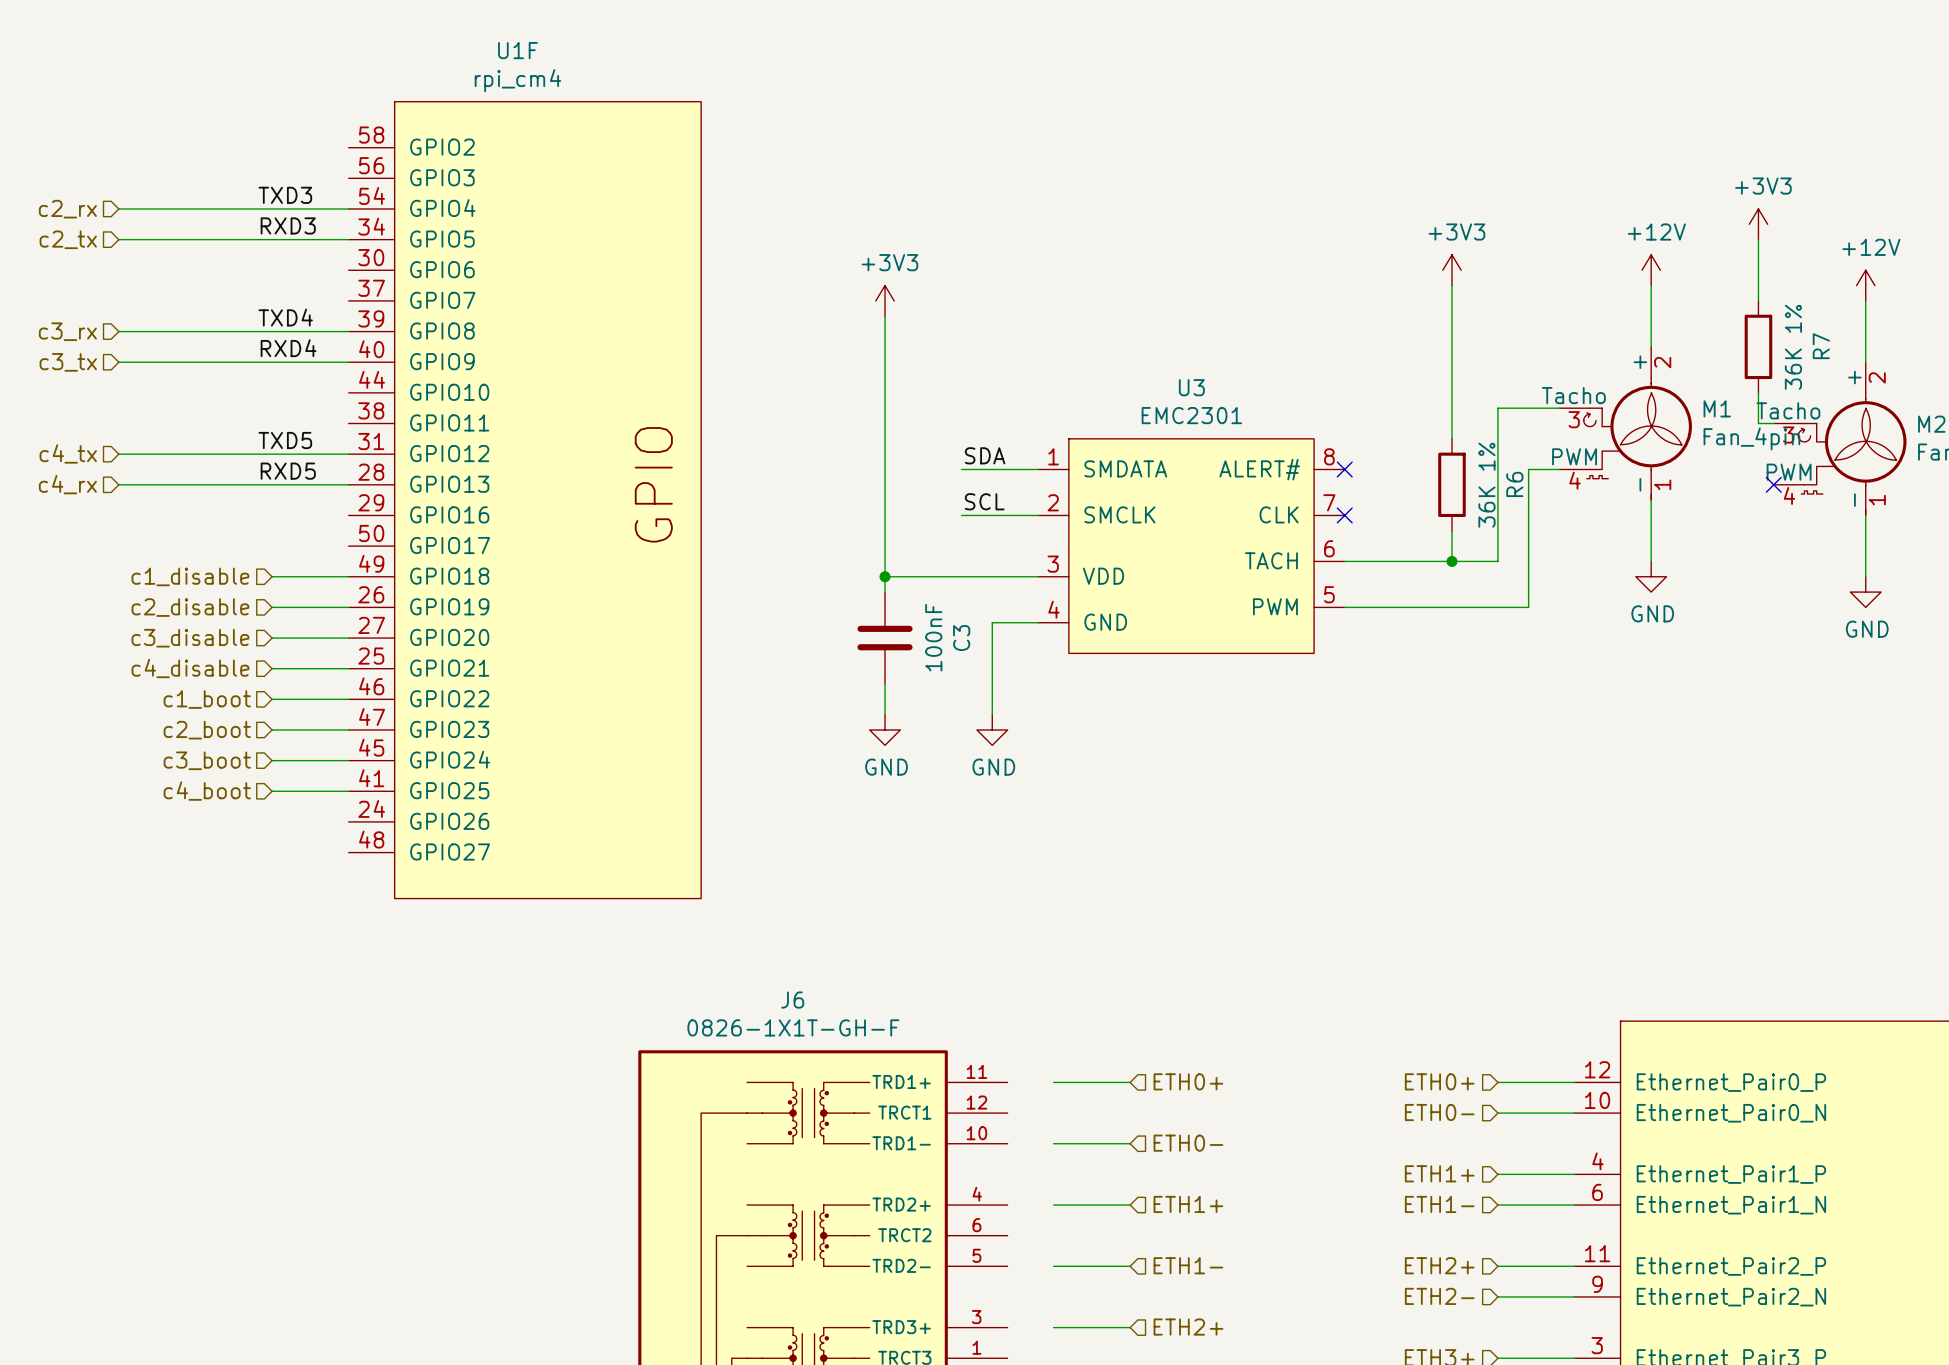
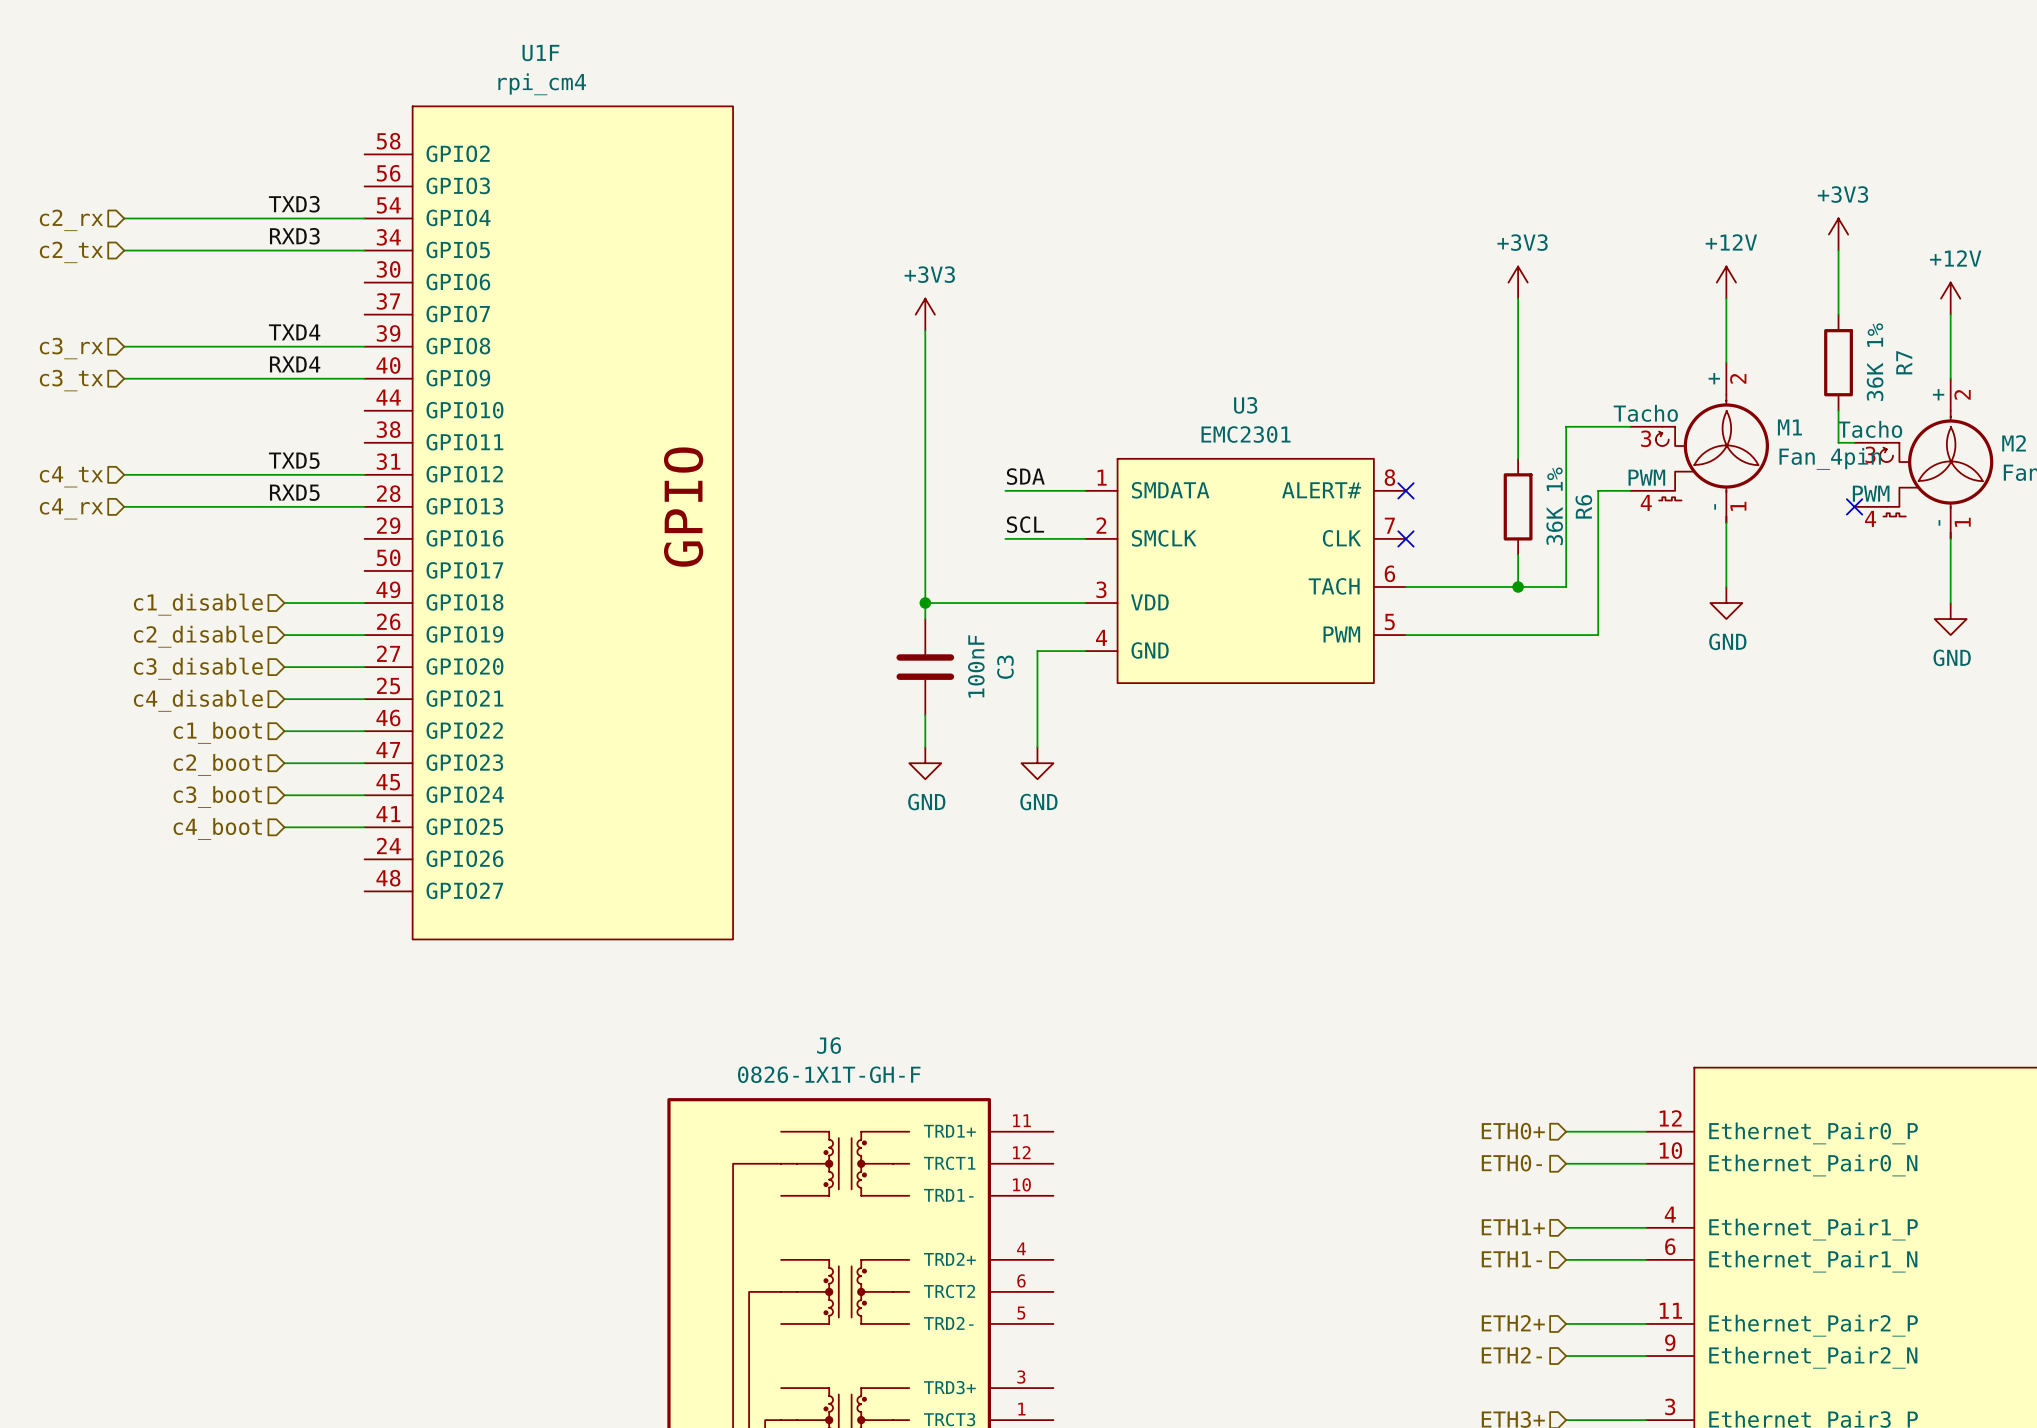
hierarchical label: ETH0+ (1188, 1081) -> none
wire: (1053, 1082) (1130, 1082) -> none
wire: (1053, 1143) (1130, 1143) -> none
hierarchical label: ETH0- (1188, 1143) -> none
hierarchical label: ETH1+ (1188, 1204) -> none
wire: (1053, 1205) (1130, 1205) -> none
hierarchical label: ETH1- (1188, 1265) -> none
wire: (1053, 1266) (1130, 1266) -> none
wire: (1053, 1327) (1130, 1327) -> none
hierarchical label: ETH2+ (1188, 1327) -> none

